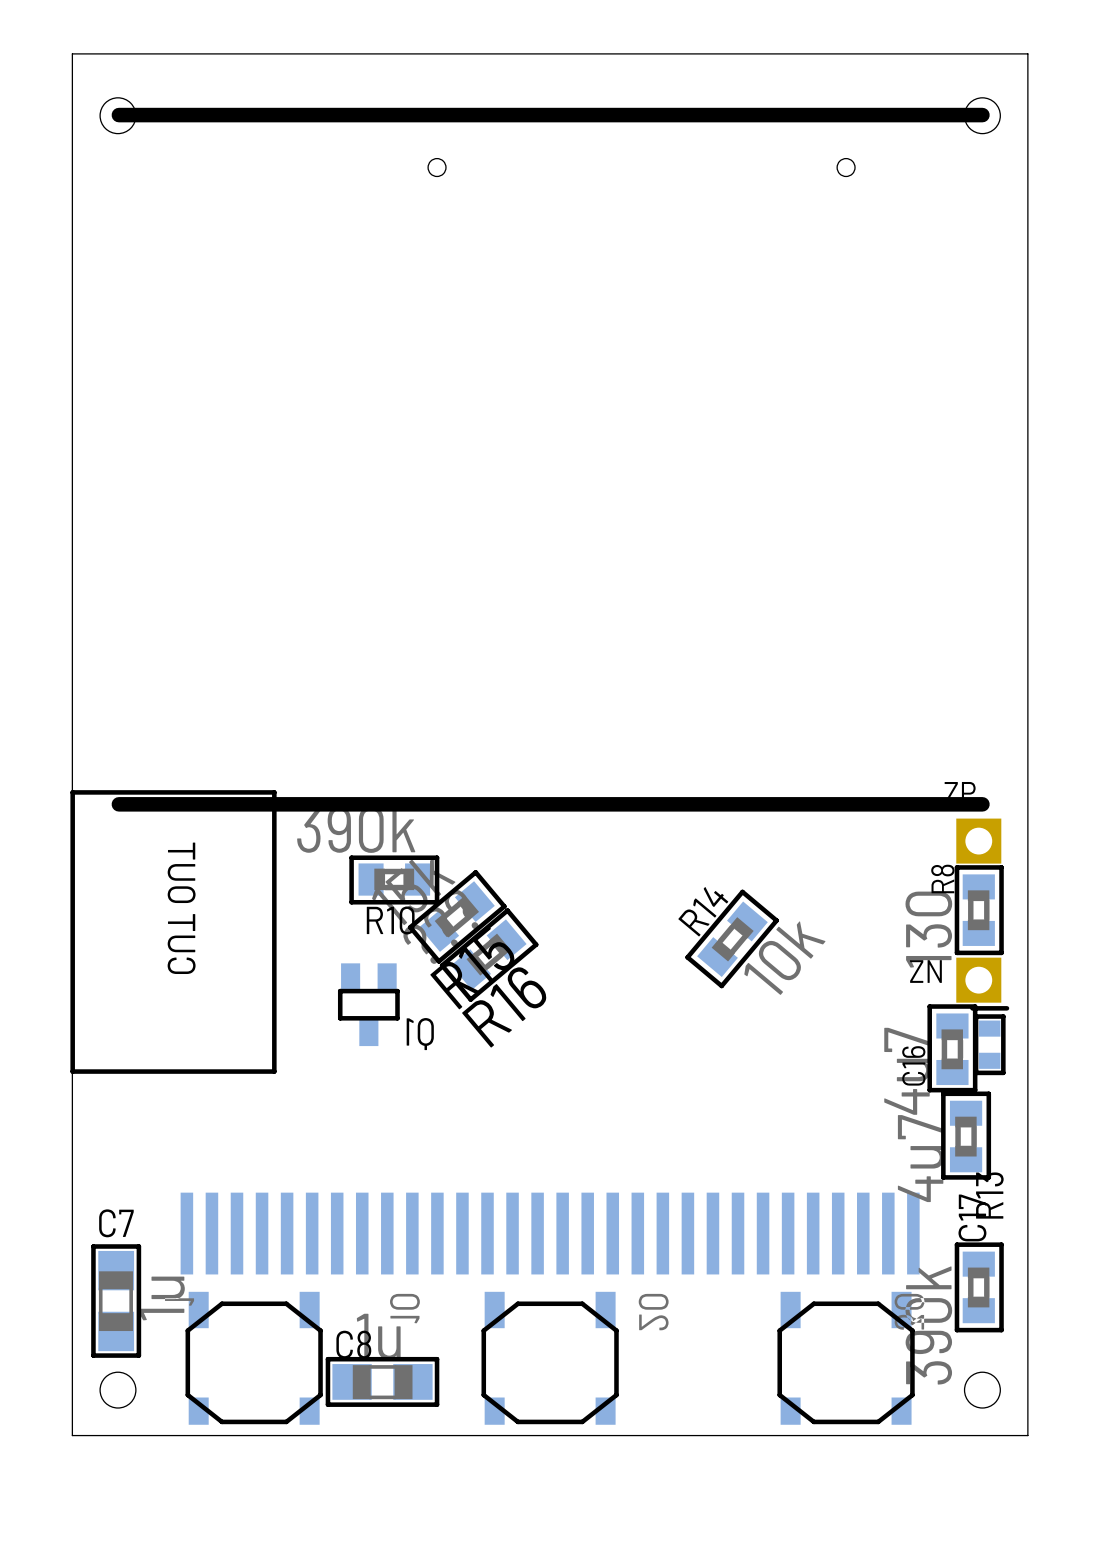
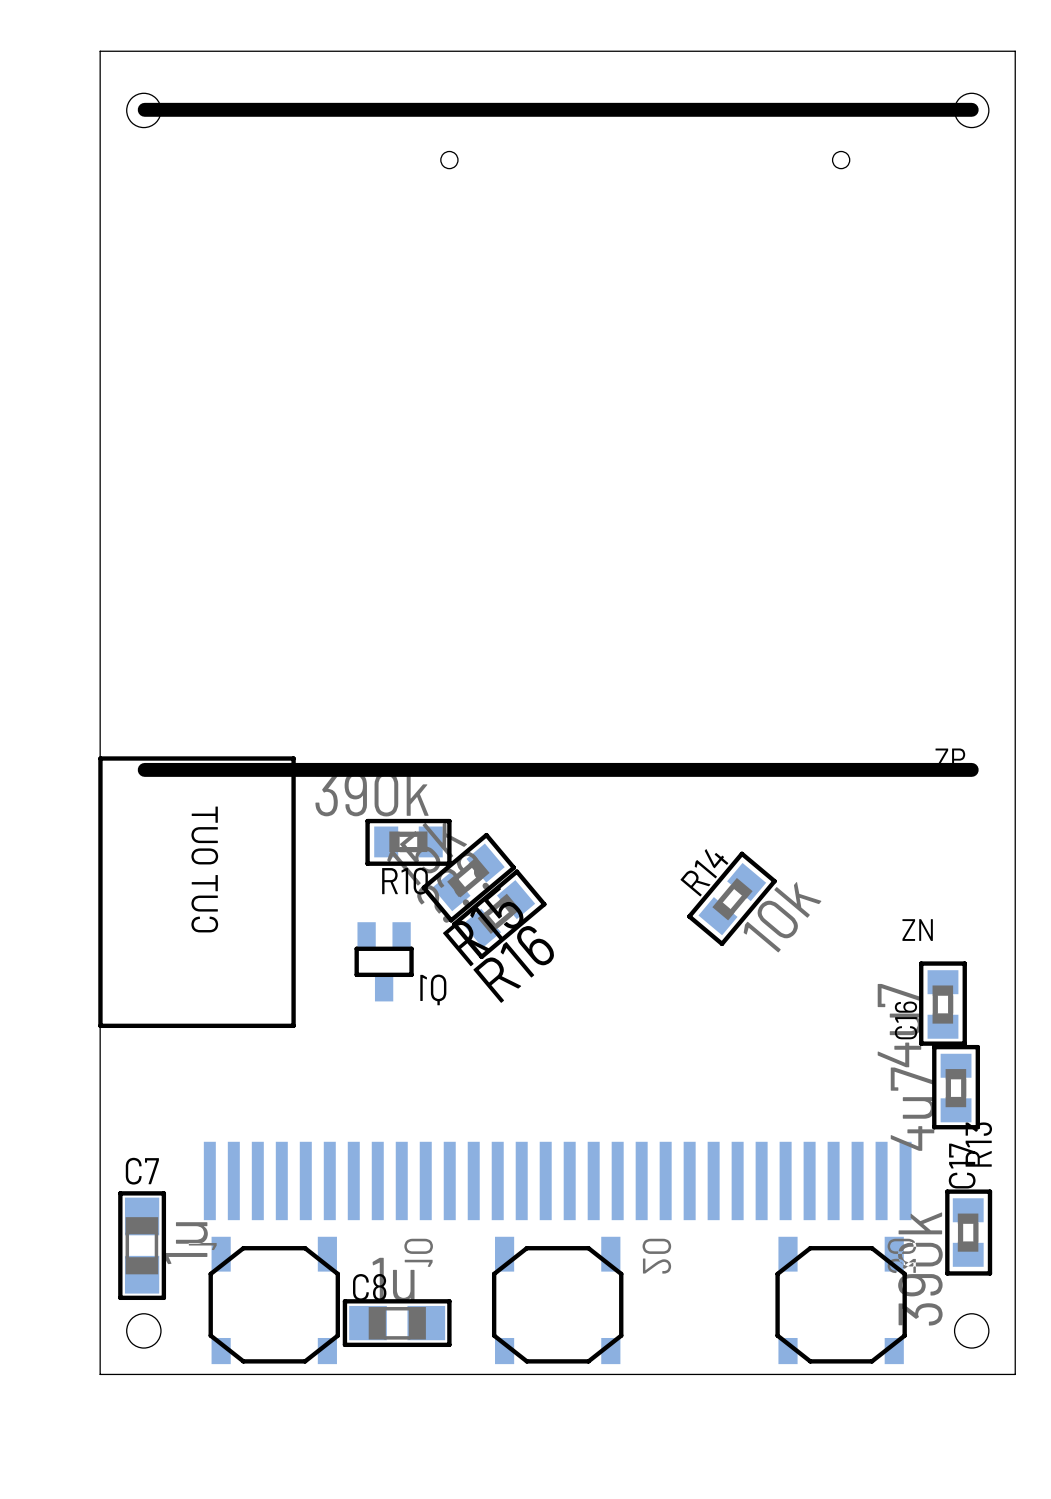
part: (978, 841) -> none
R8: 130 (979, 910) -> none
part: (978, 980) -> none
part: (989, 1040) -> none

